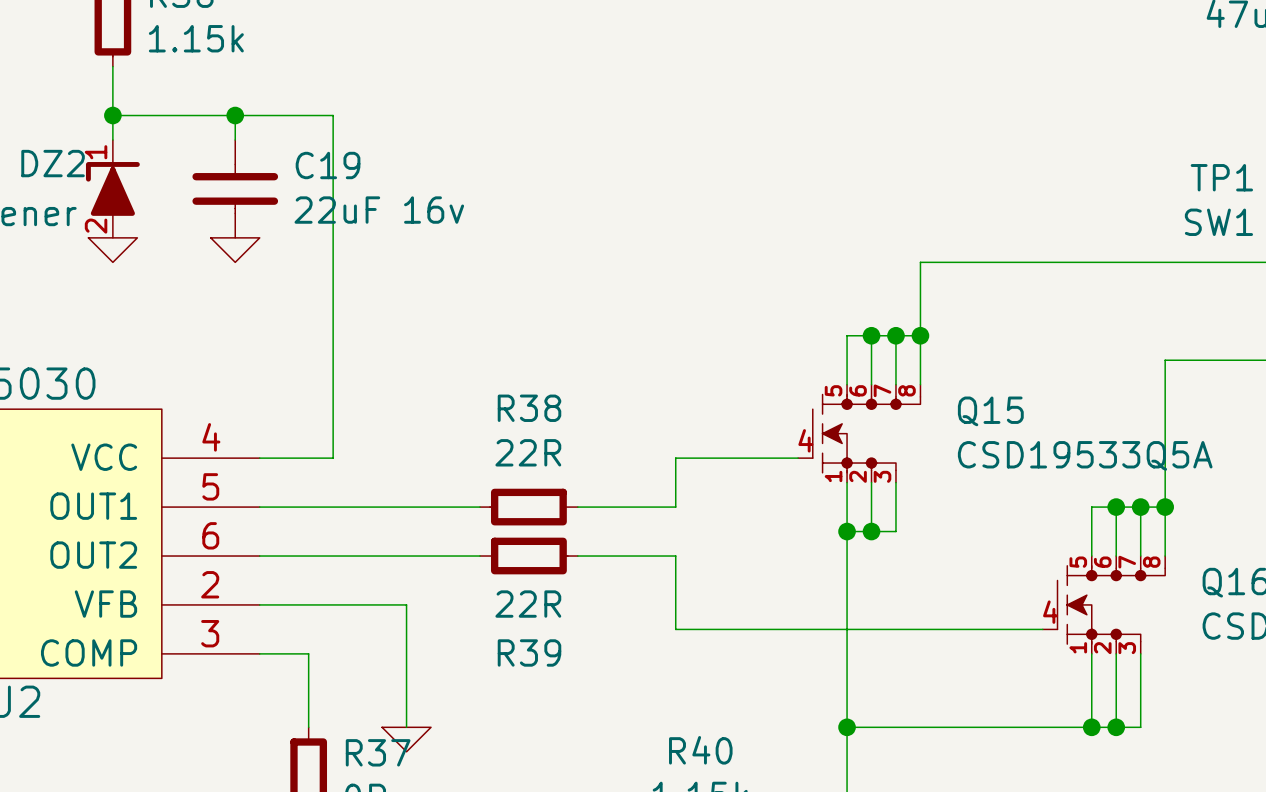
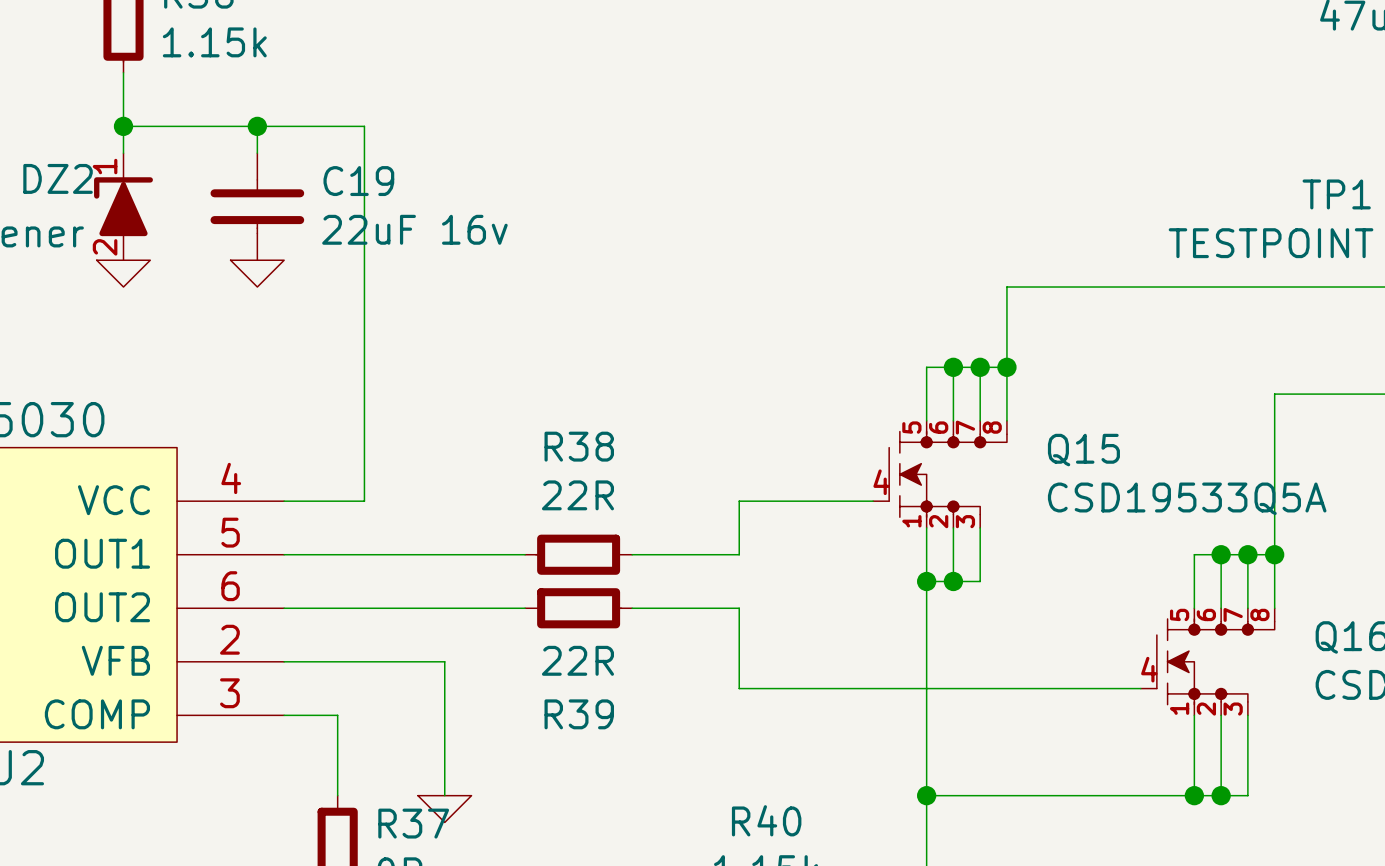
TP1 value: SW1 (1218, 222) -> TESTPOINT (1271, 243)

